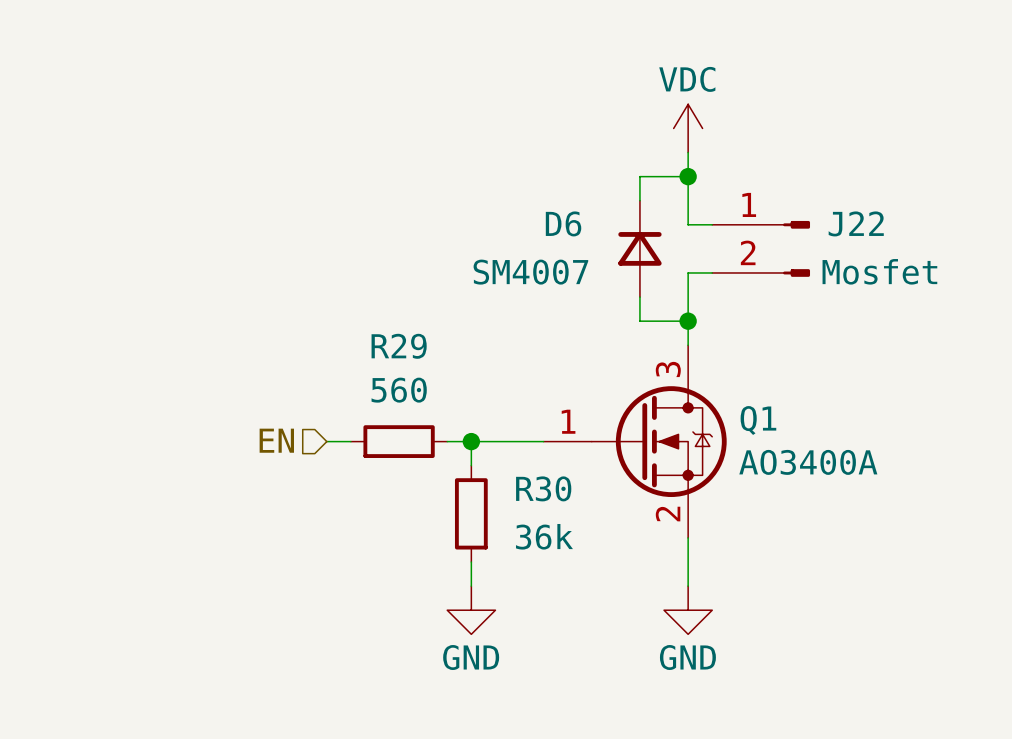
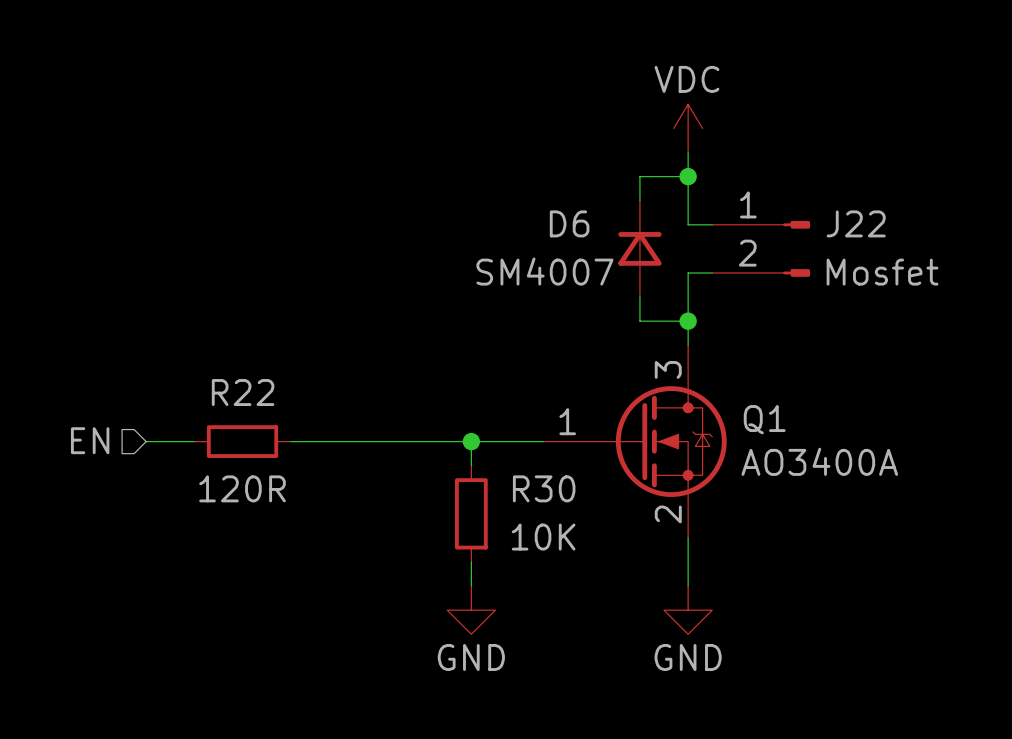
hierarchical label position: EN (276, 440) -> EN (90, 440)
wire: none -> (146, 441) (194, 441)
R22: none -> 120R (242, 441)
wire: none -> (290, 441) (326, 441)
wire: none -> (350, 441) (447, 441)
R29: 560 (399, 441) -> none
R30 value: 36k (544, 536) -> 10K (543, 537)

